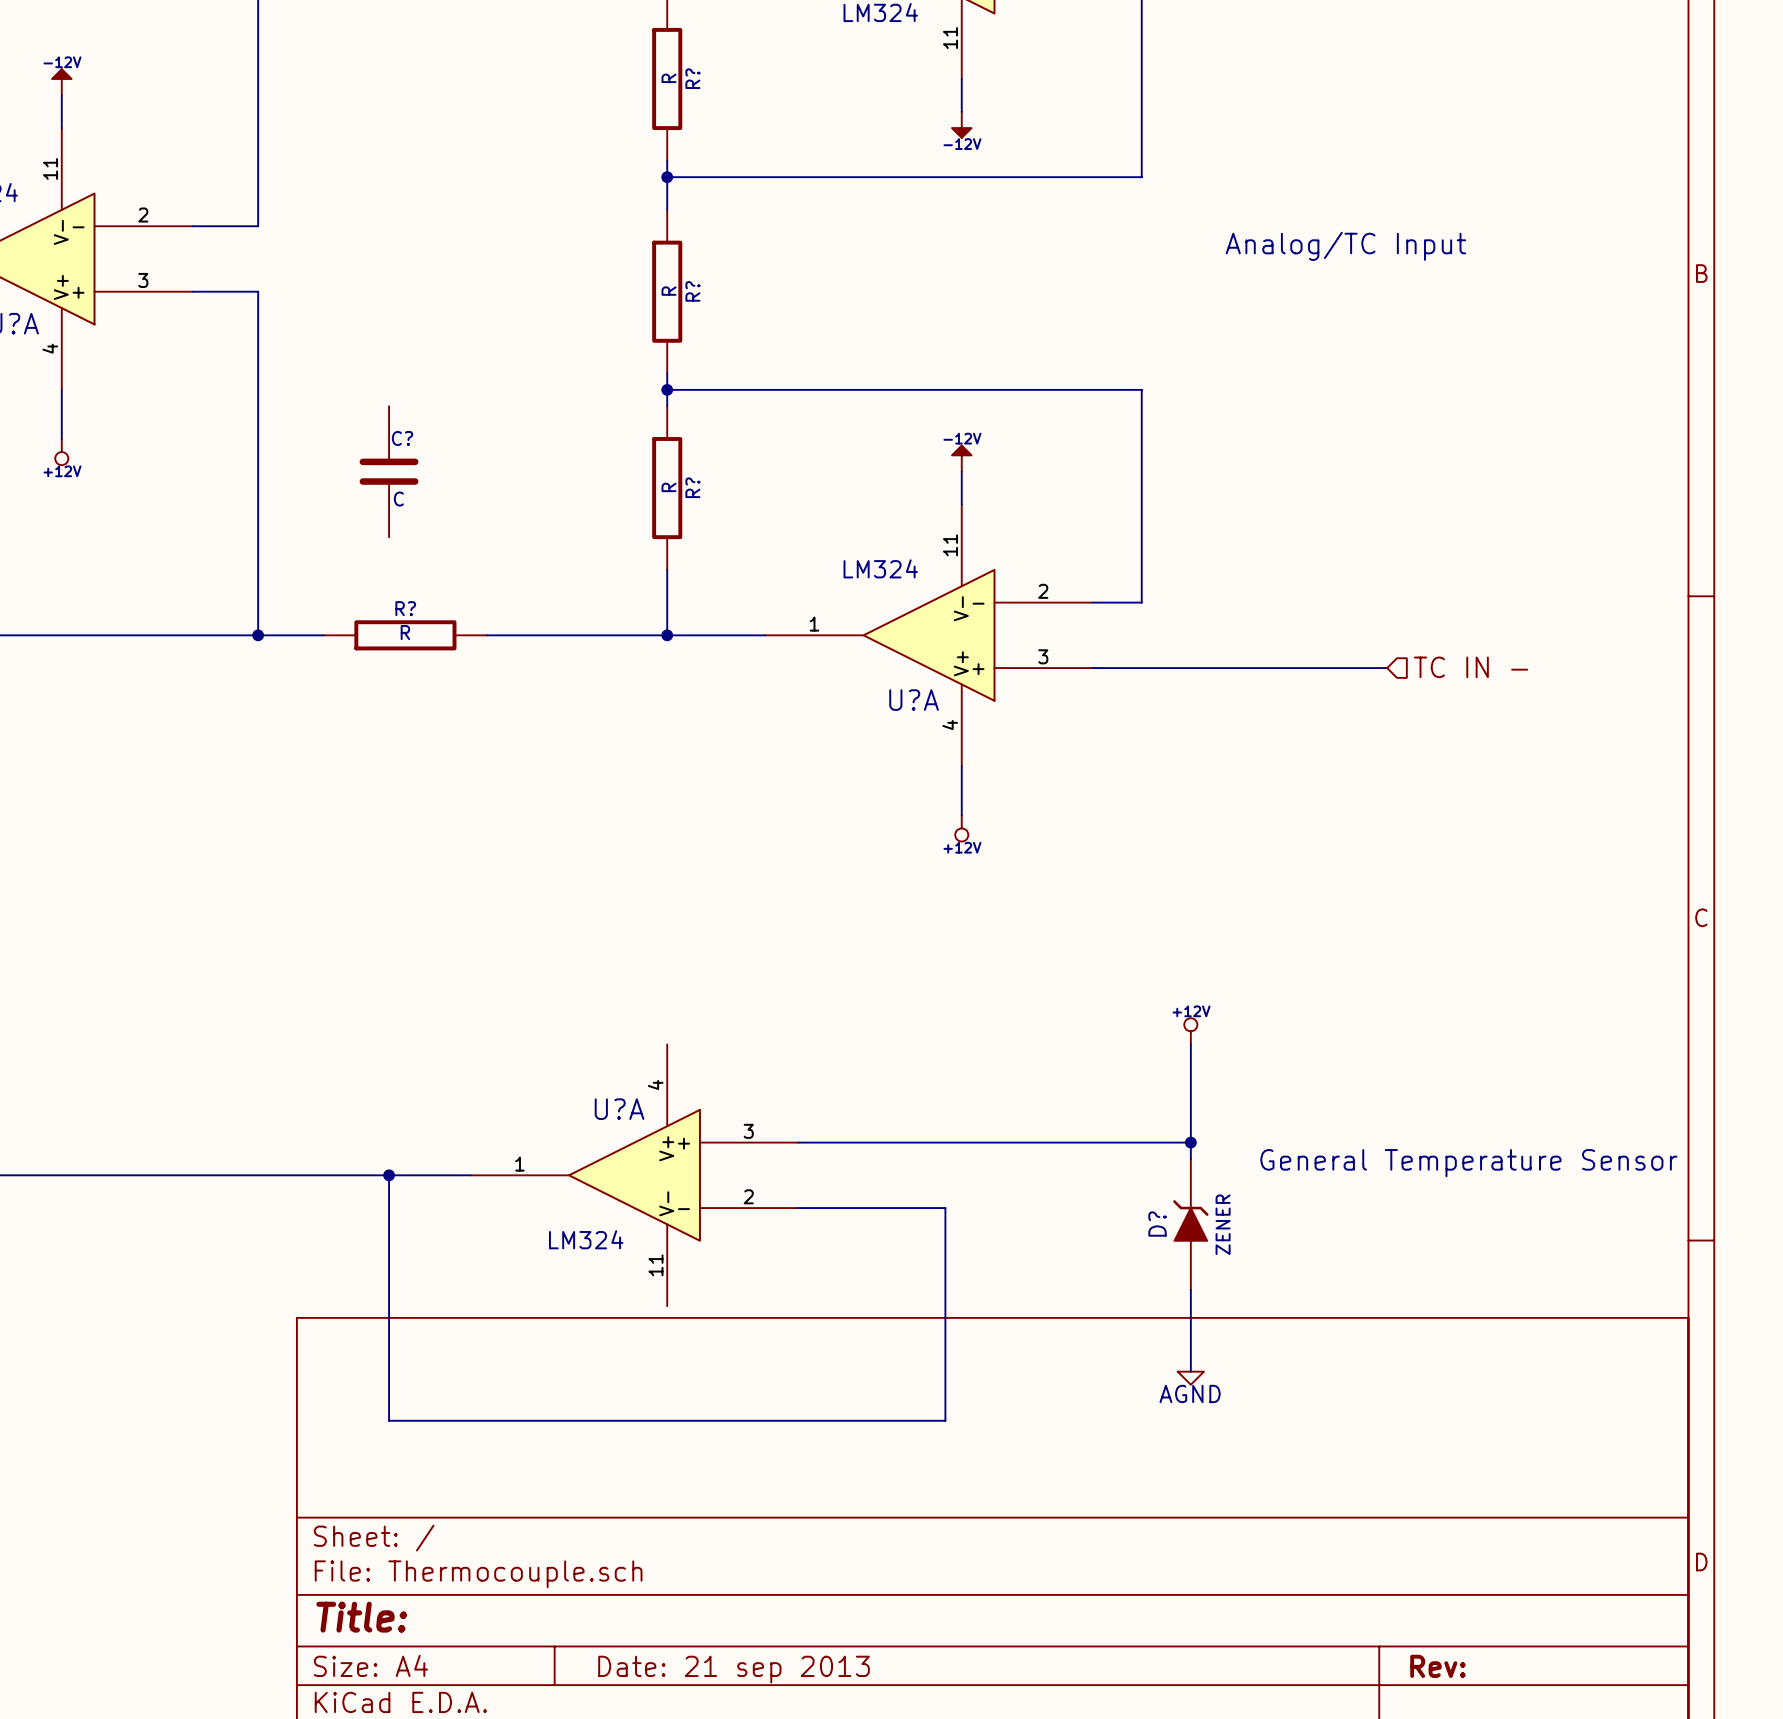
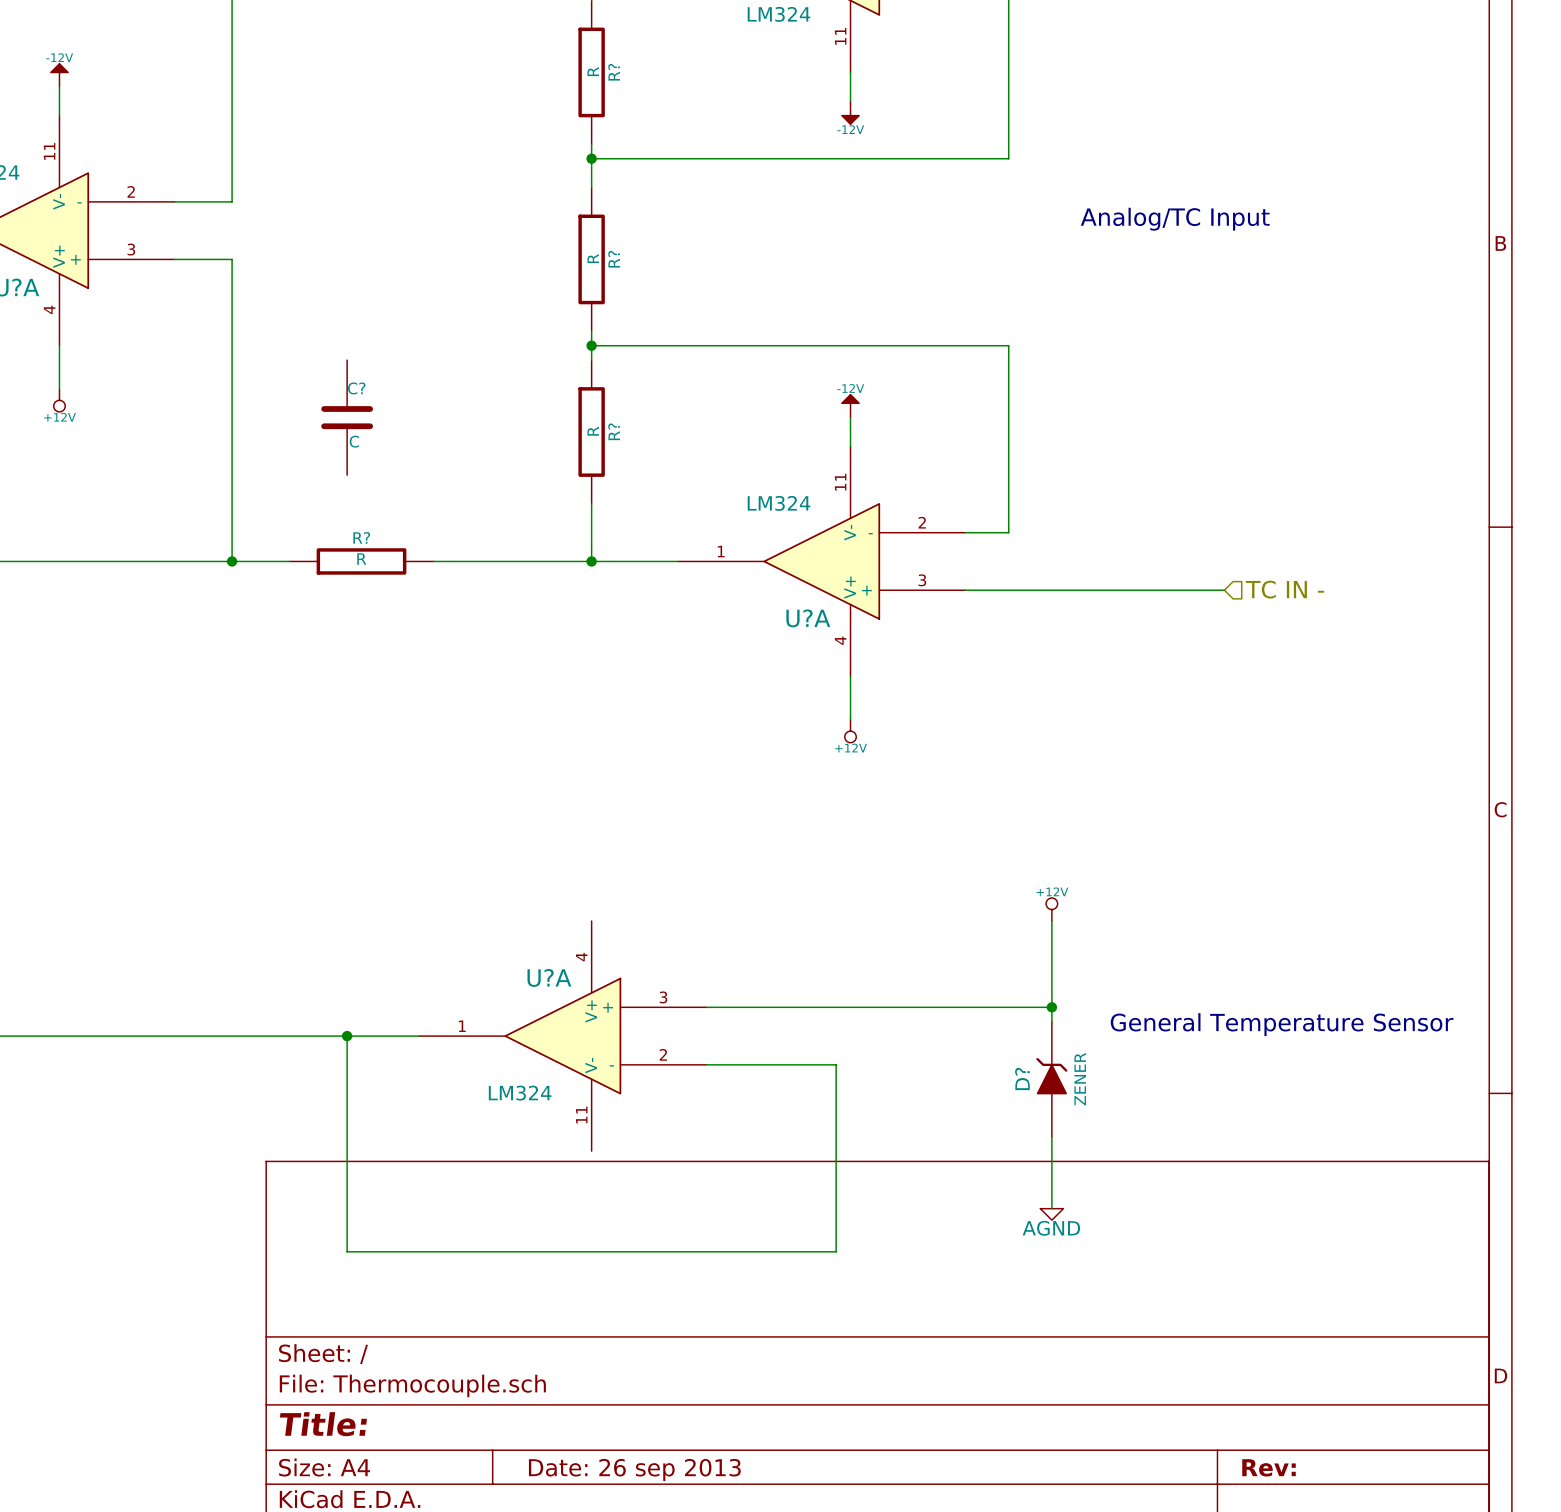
title block: Date: 21 sep 2013 (734, 1669) -> Date: 26 sep 2013 (634, 1469)

